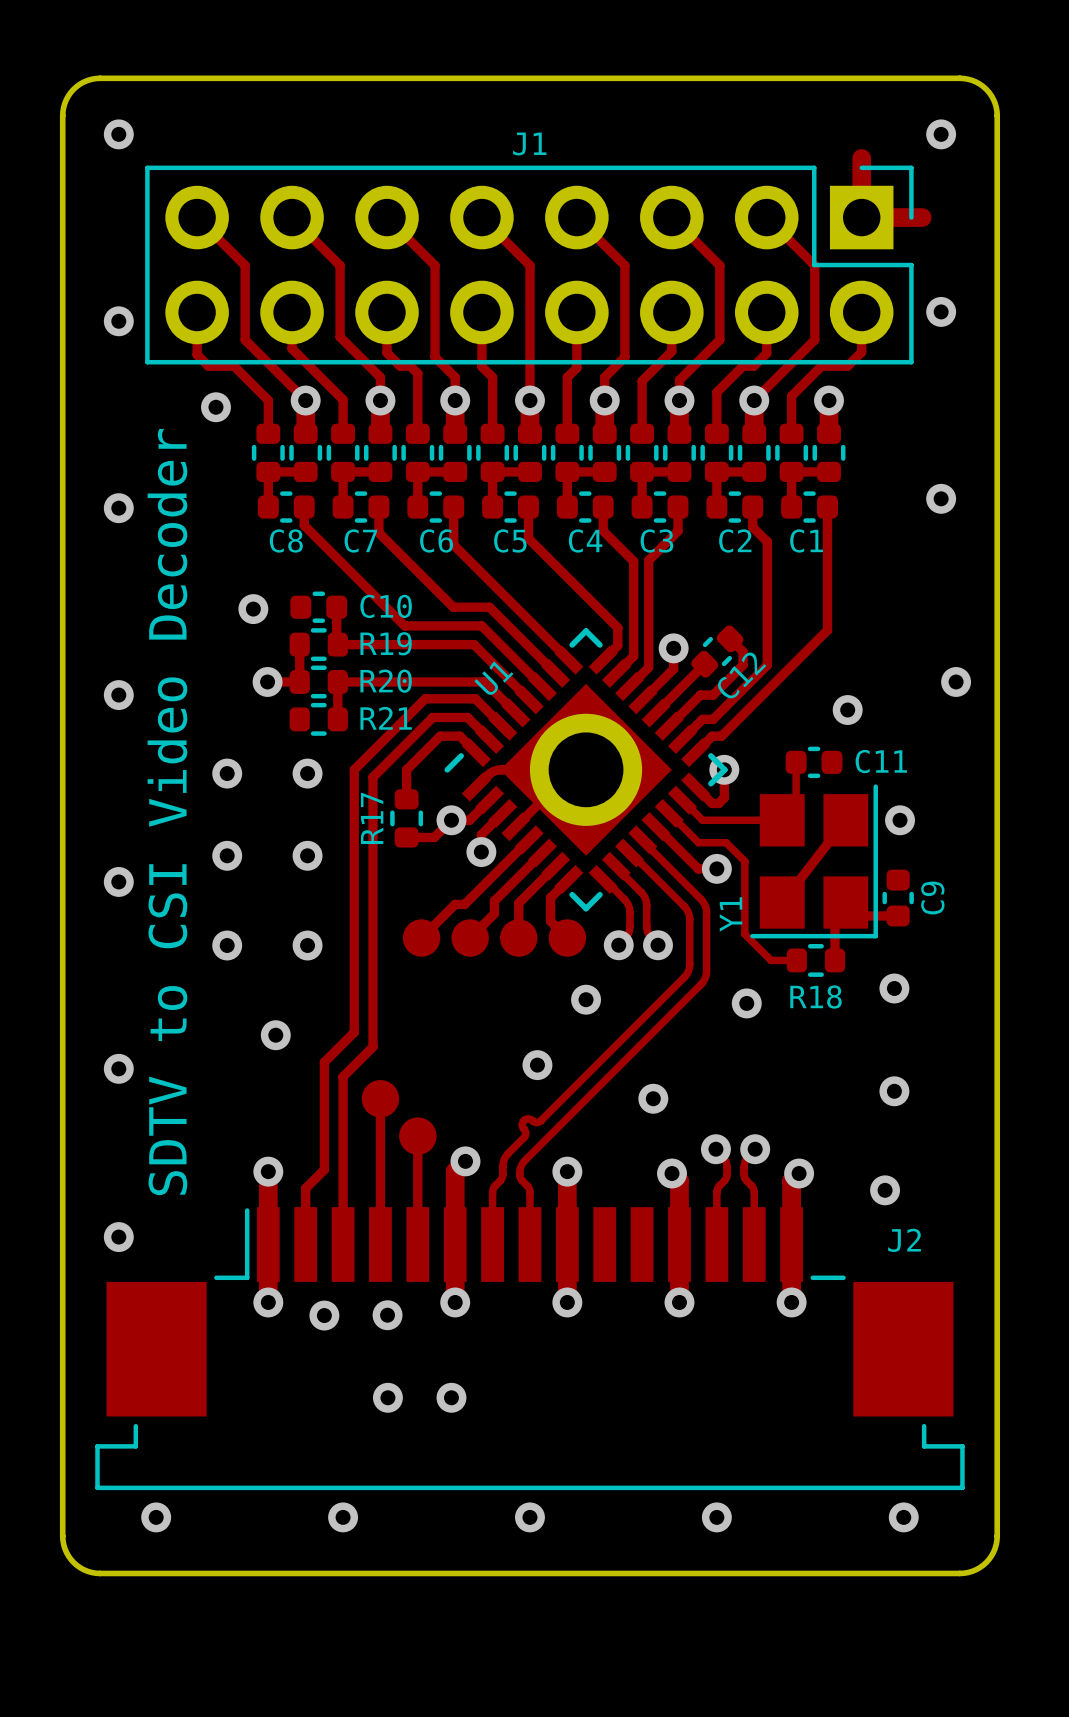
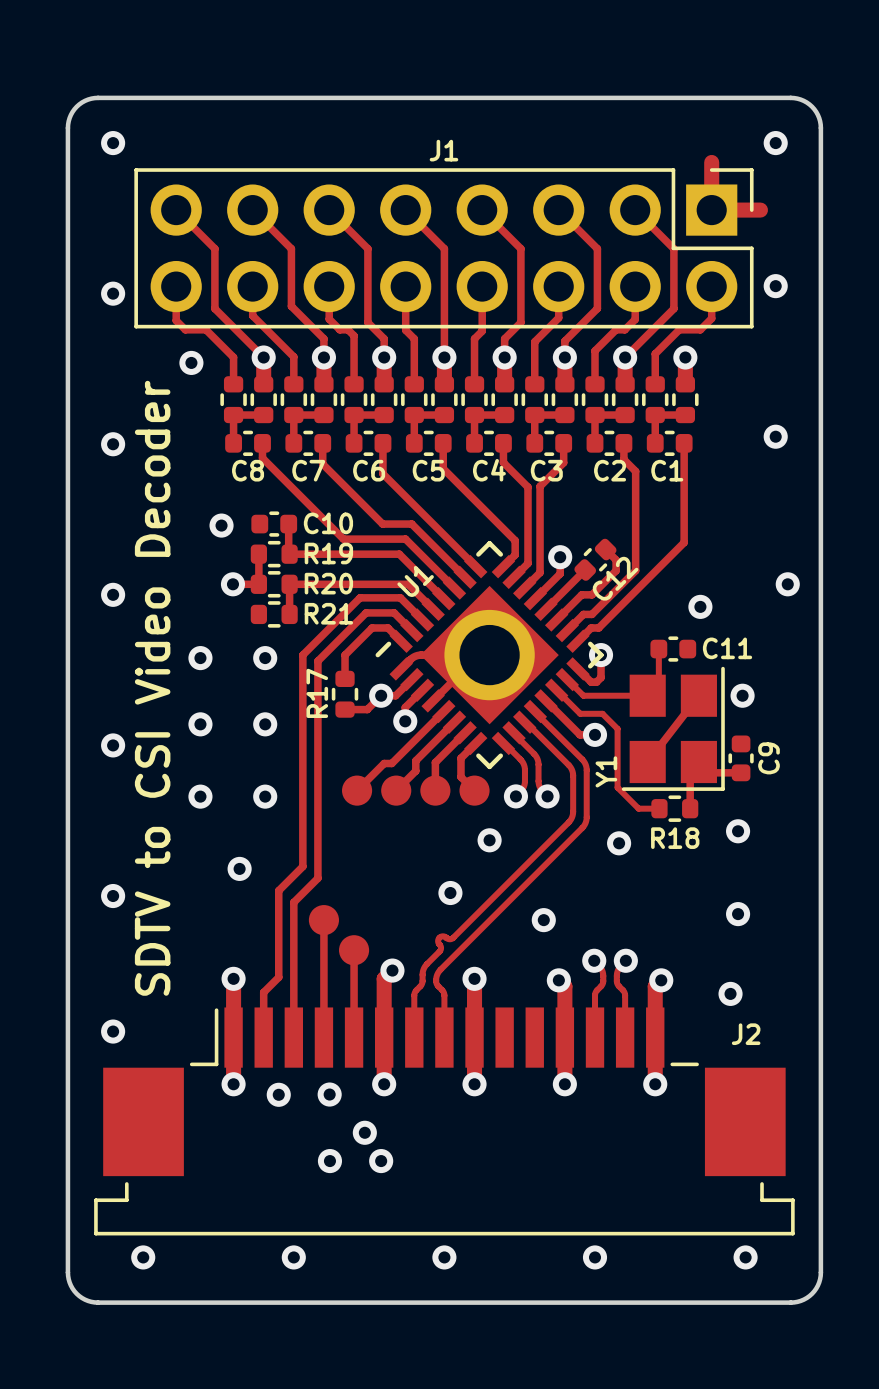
via: none -> (364, 1132)

